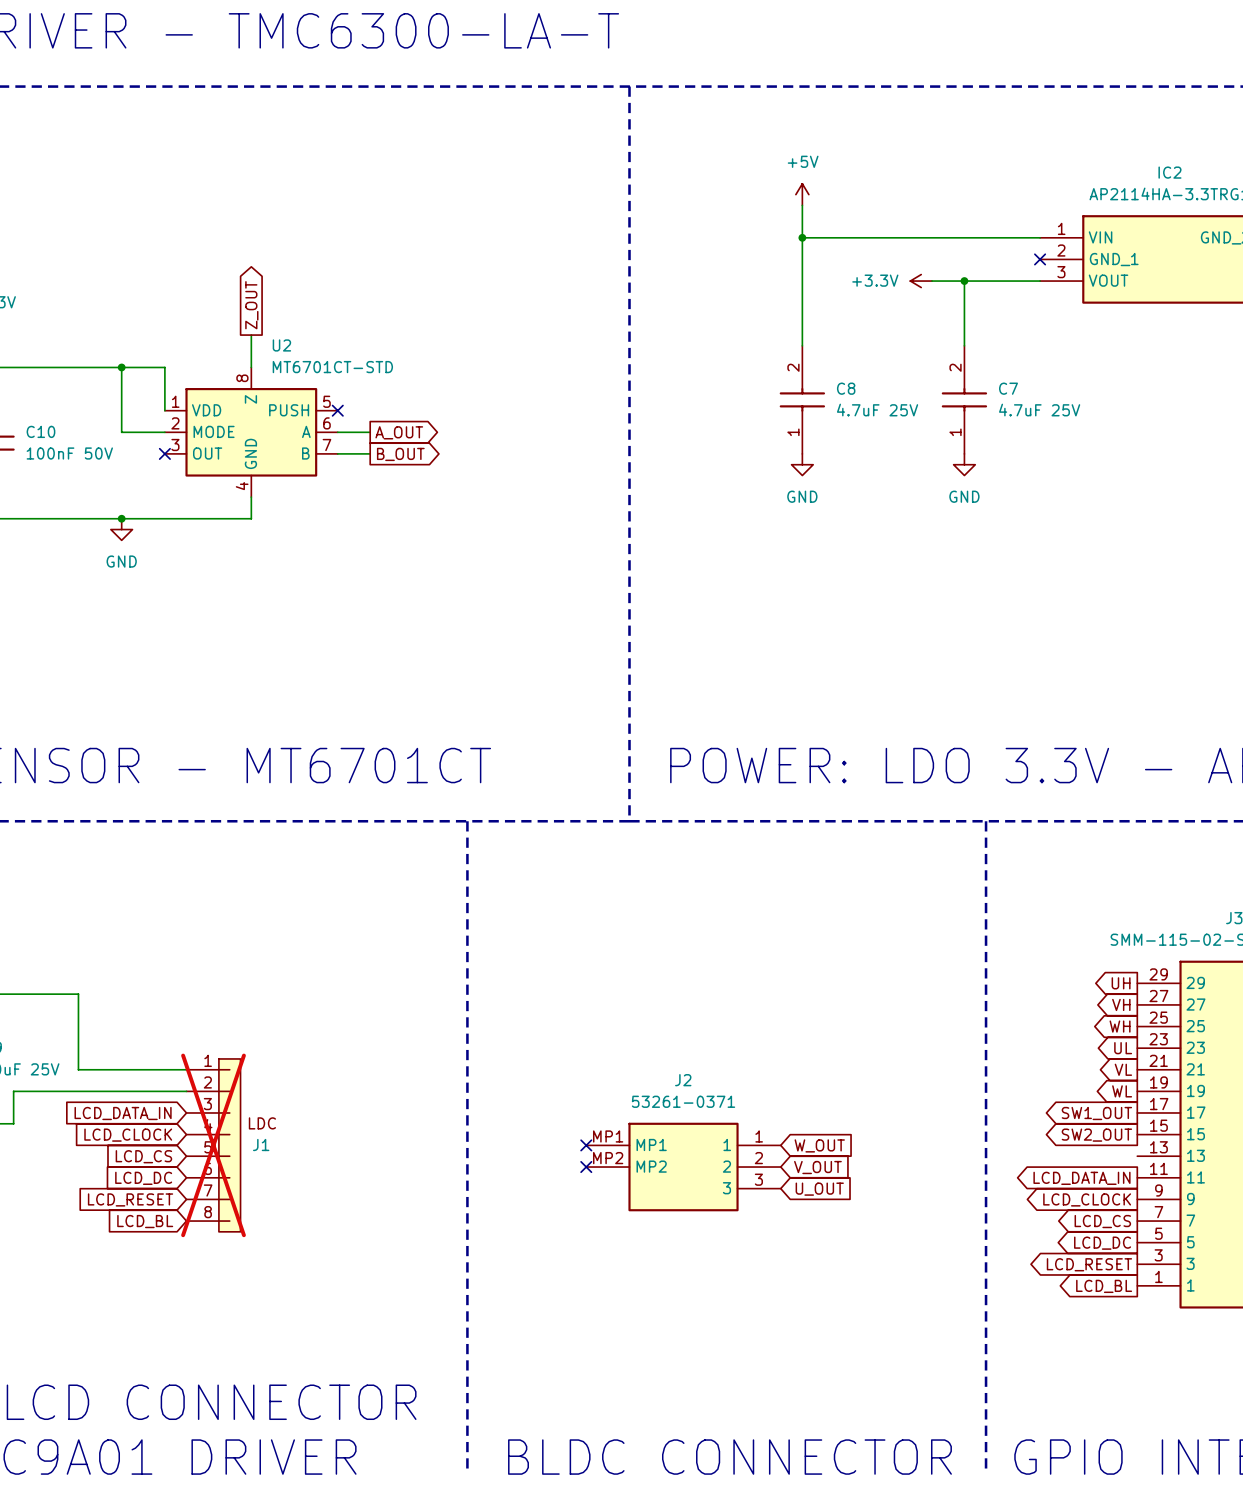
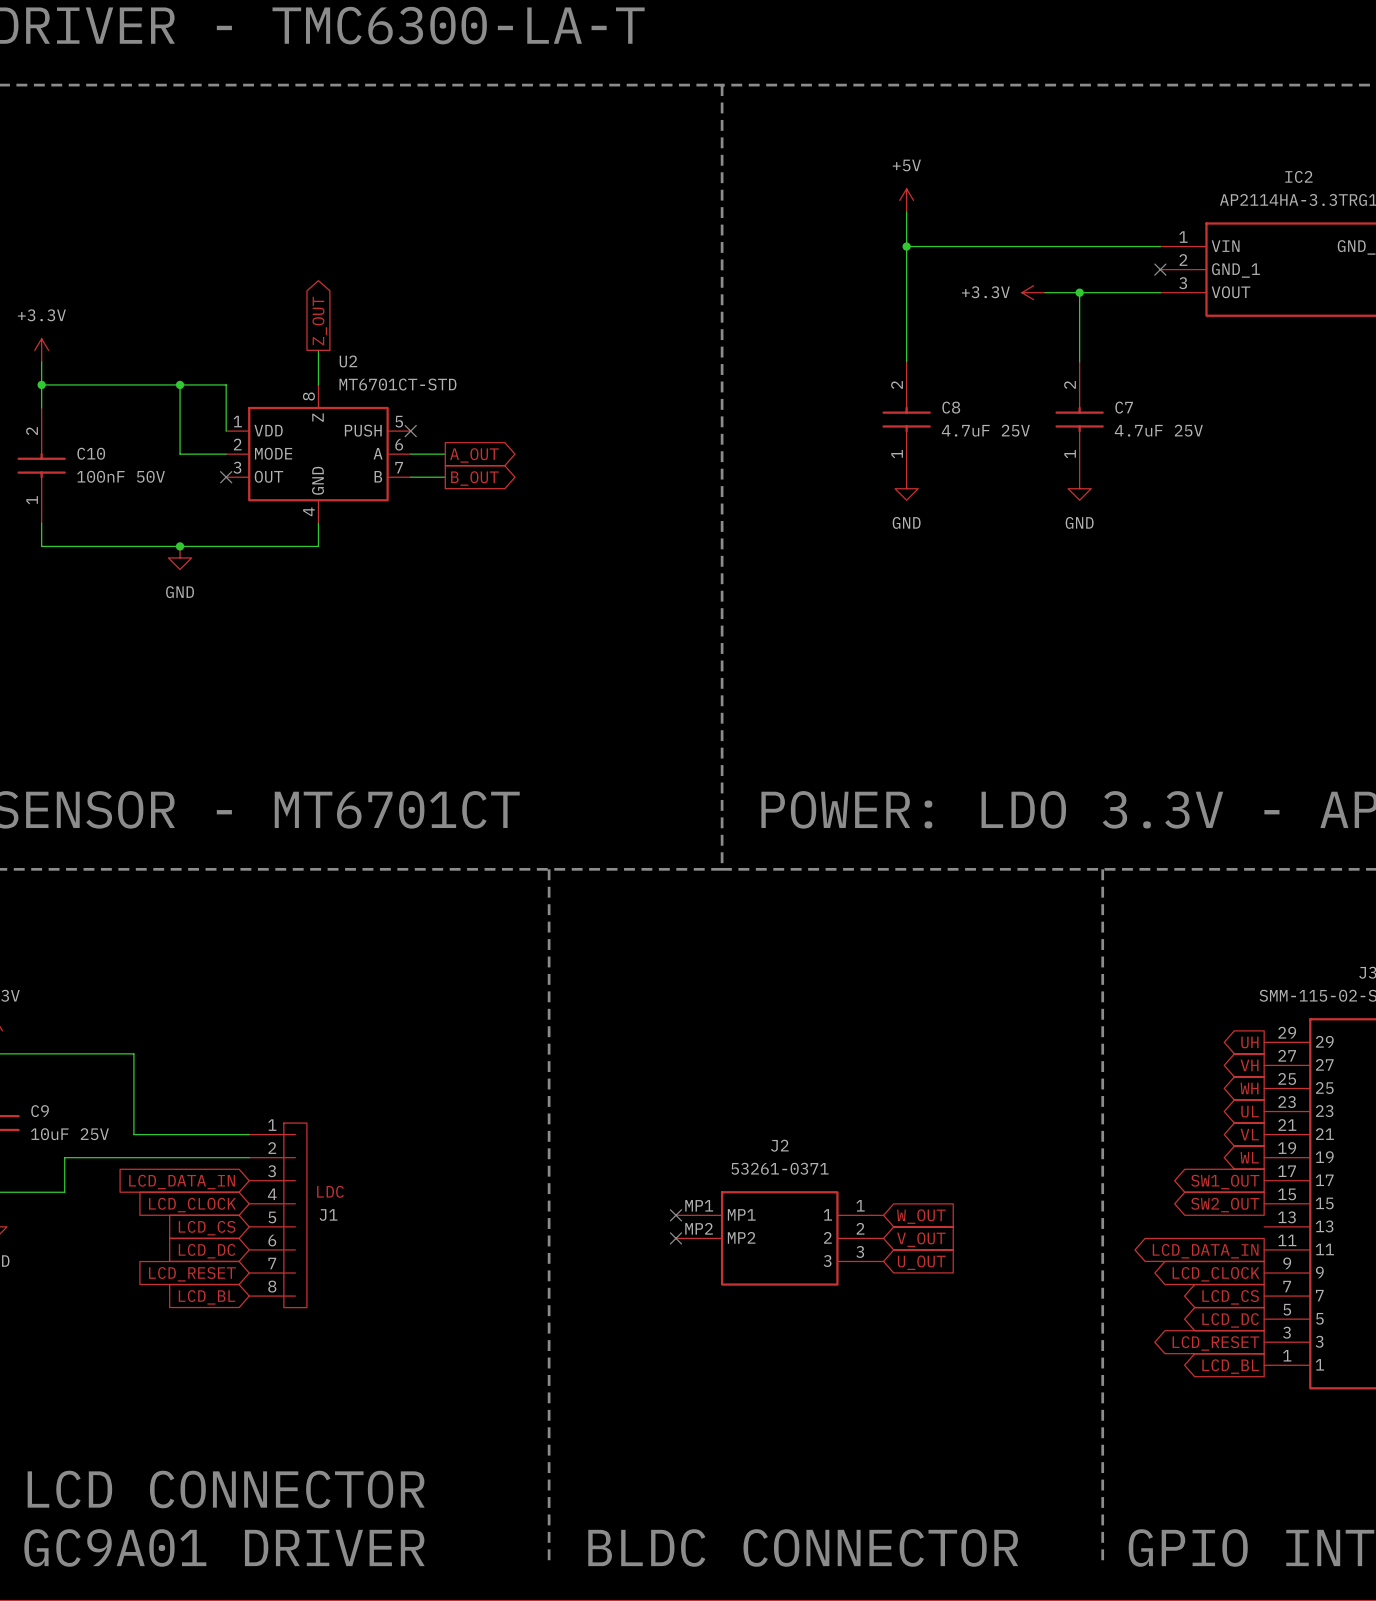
J1 do-not-place cross: (213, 1145) -> none

